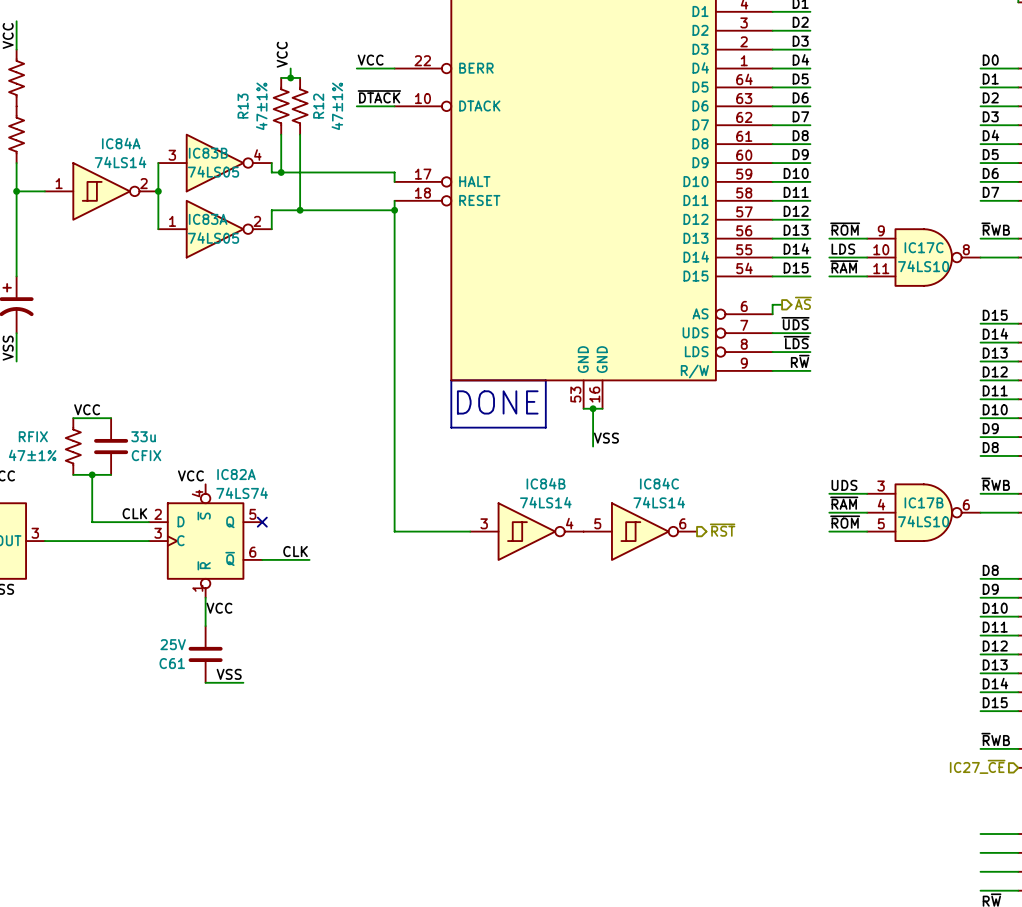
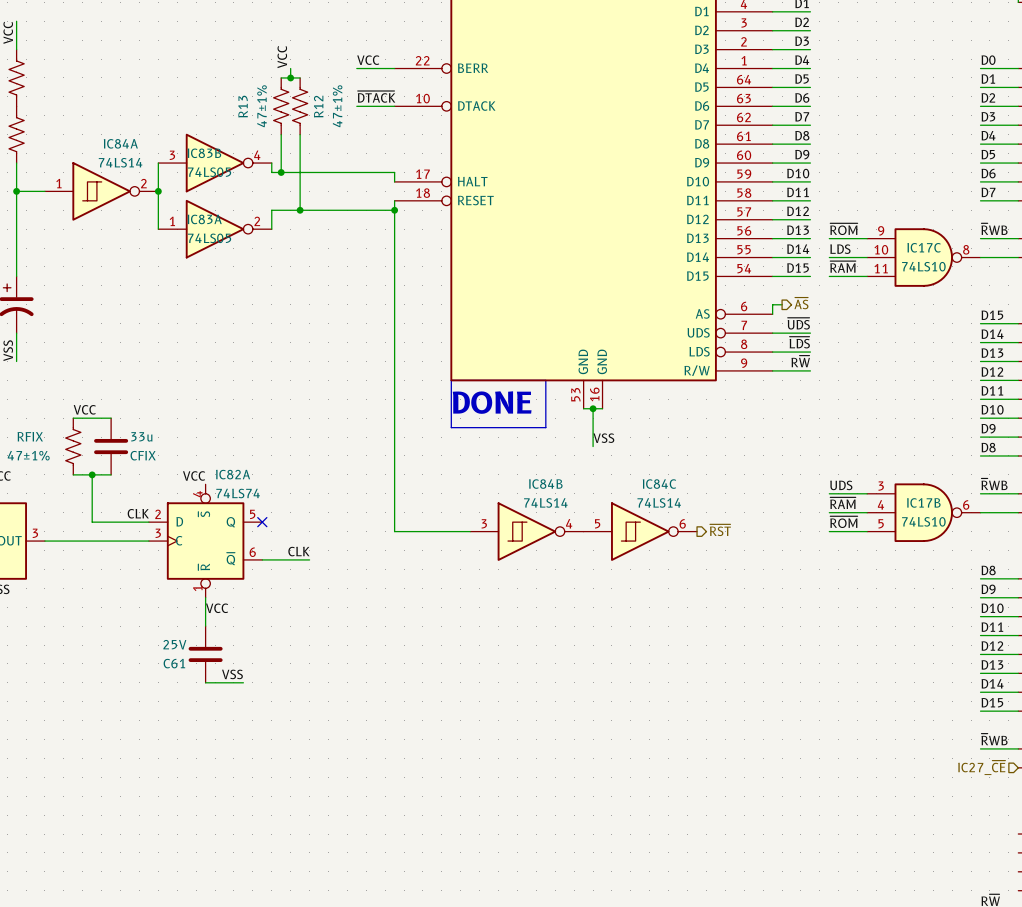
wire: (980, 834) (1018, 834) -> none
wire: (980, 852) (1018, 852) -> none
wire: (980, 871) (1018, 871) -> none
wire: (980, 890) (1018, 890) -> none

